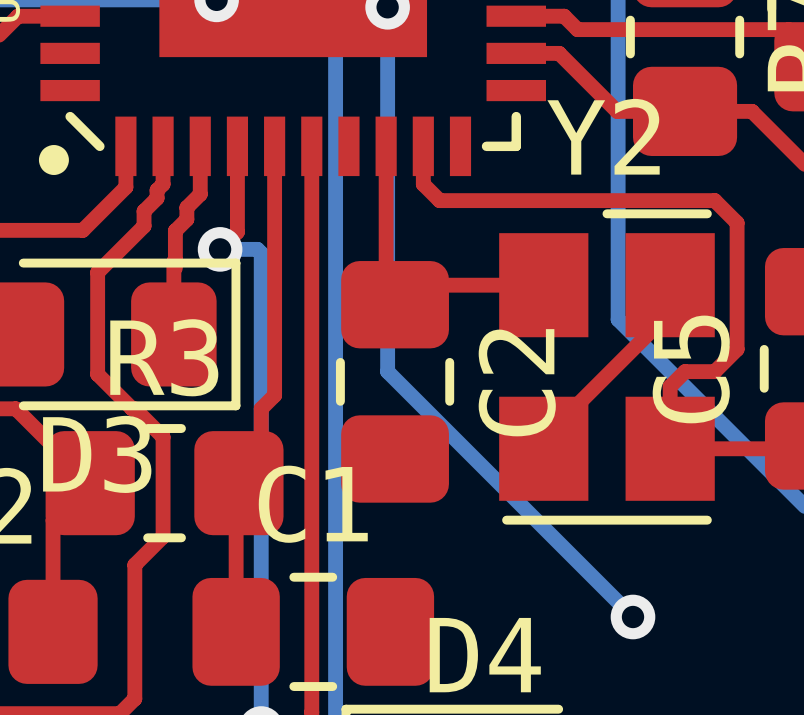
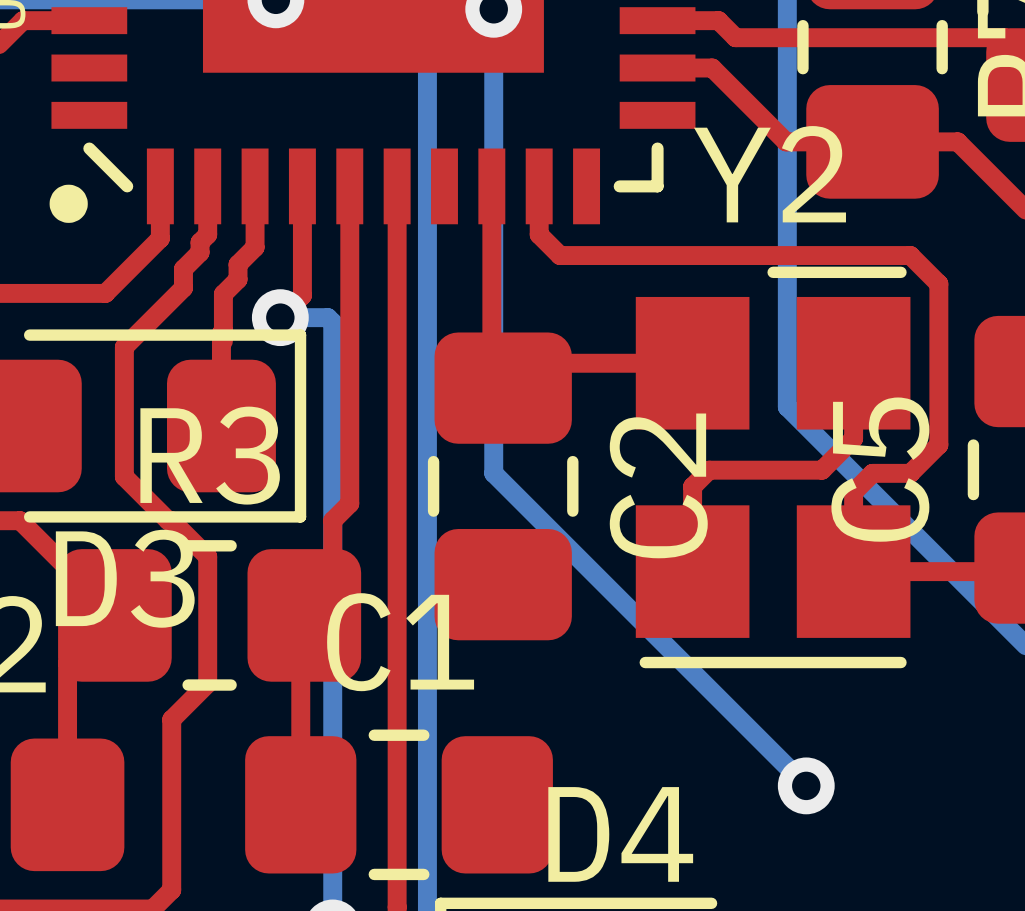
top track: (670, 312) (543, 438) -> (853, 401) (853, 438) (822, 470) (709, 470) (692, 486) (692, 558)

